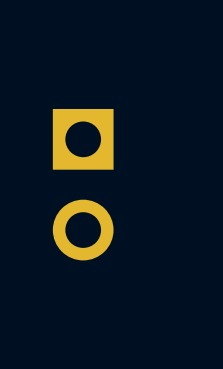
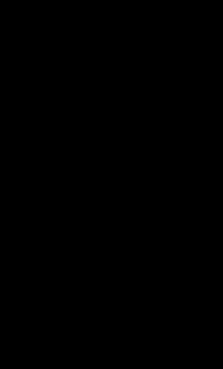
part: (83, 184) -> none

